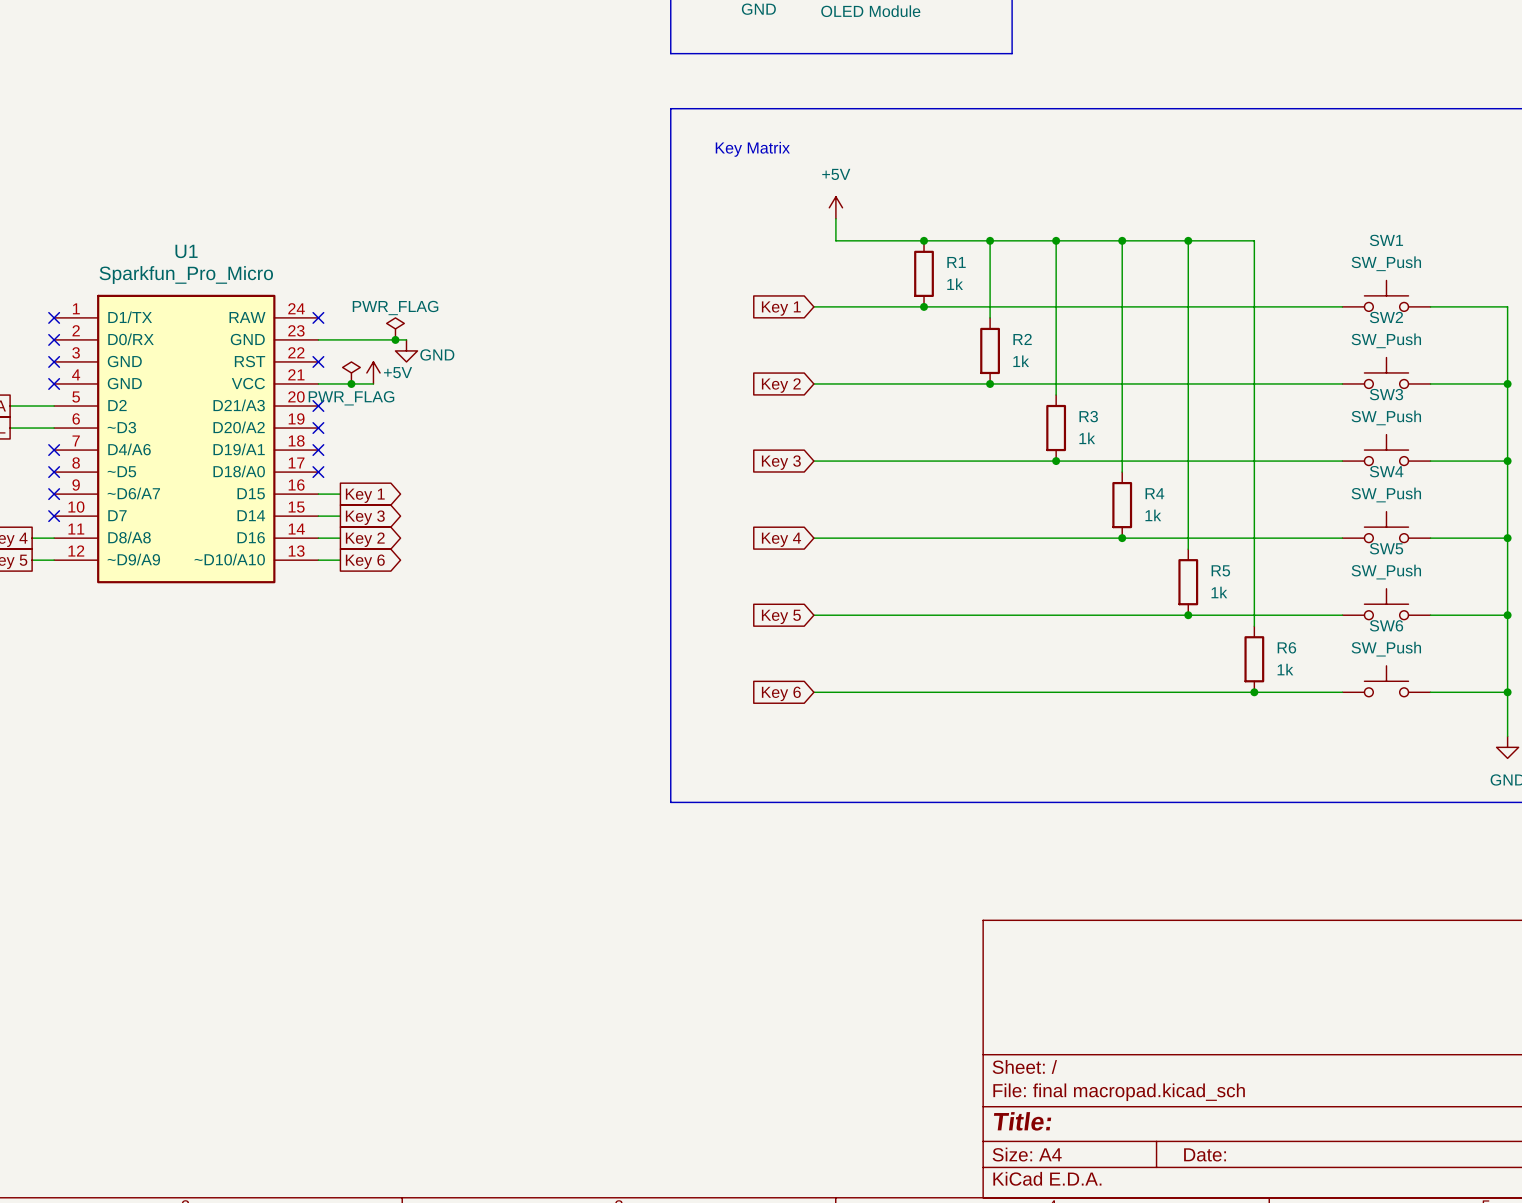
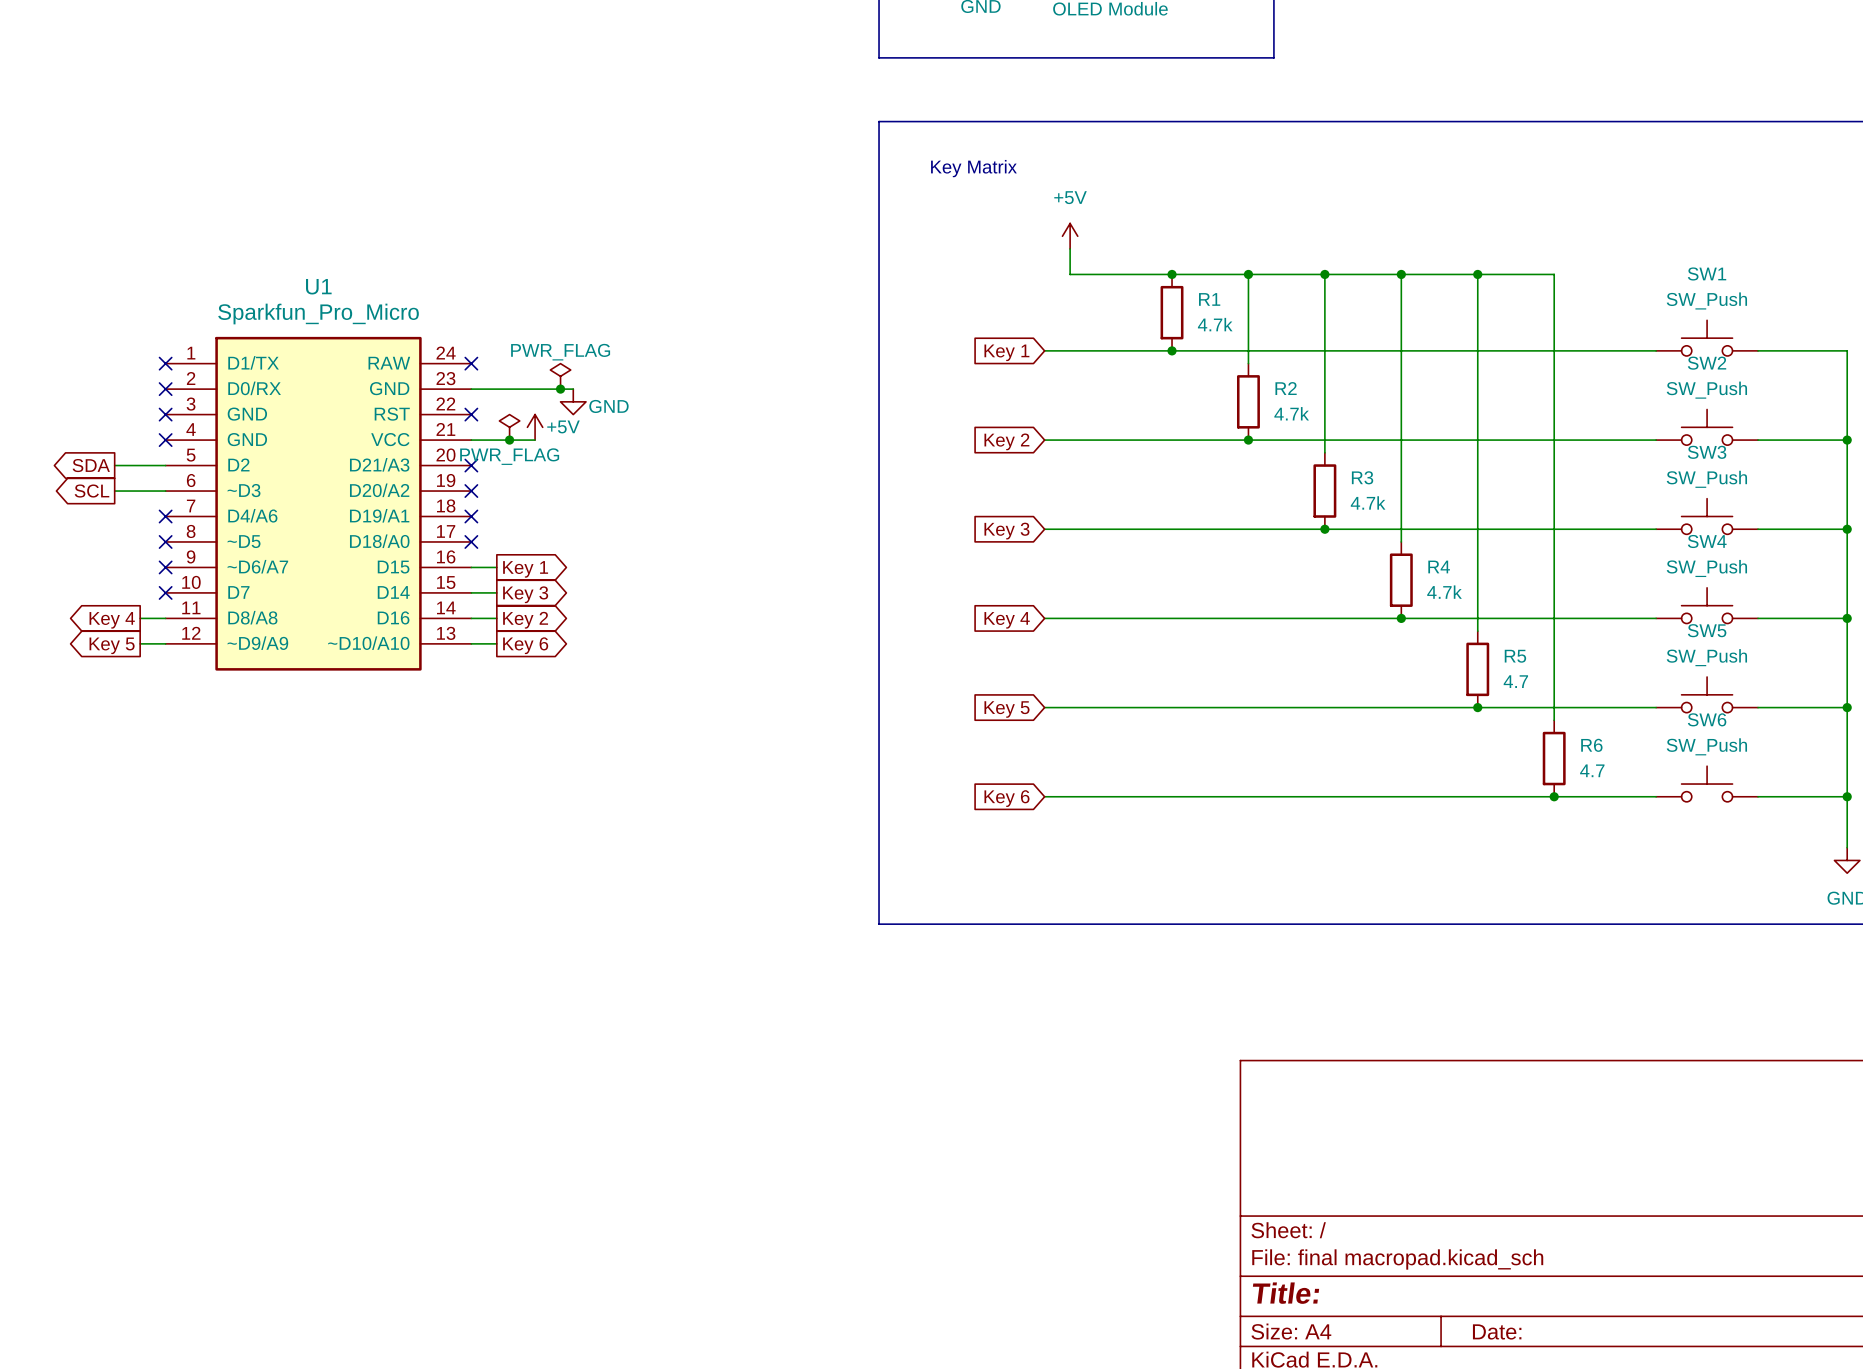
R1 value: 1k (955, 284) -> 4.7k (1215, 324)
R2 value: 1k (1021, 361) -> 4.7k (1291, 413)
R3 value: 1k (1087, 438) -> 4.7k (1368, 502)
R4 value: 1k (1153, 515) -> 4.7k (1444, 592)
R5 value: 1k (1219, 592) -> 4.7 (1515, 681)
R6 value: 1k (1285, 669) -> 4.7 (1592, 770)

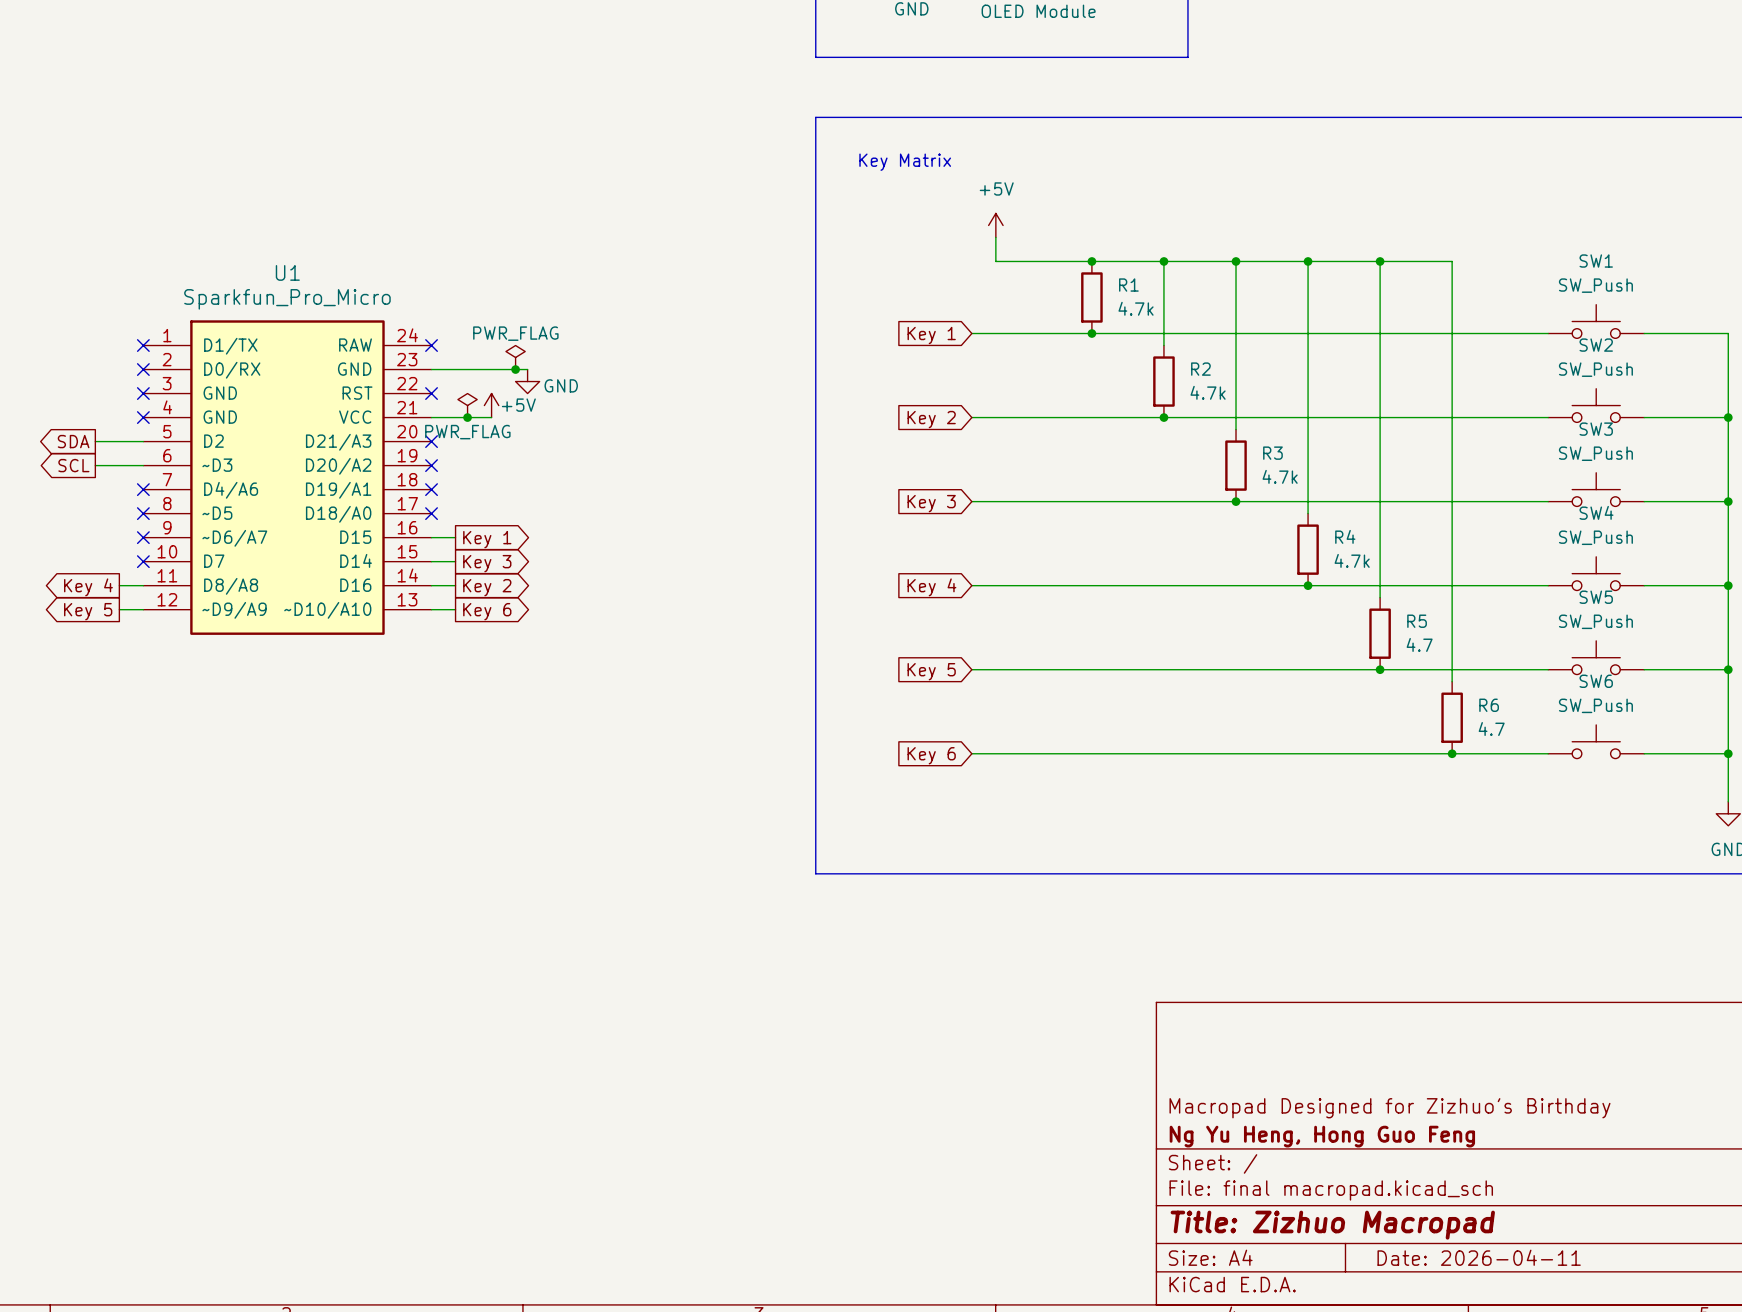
title block: none -> Macropad Designed for Zizhuo's Birthday (1389, 1108)
title block: none -> Ng Yu Heng, Hong Guo Feng (1322, 1136)
title block: Title: (1286, 1293) -> Title: Zizhuo Macropad (1332, 1225)
title block: Date: (1497, 1331) -> Date: 2026-04-11 (1479, 1257)

